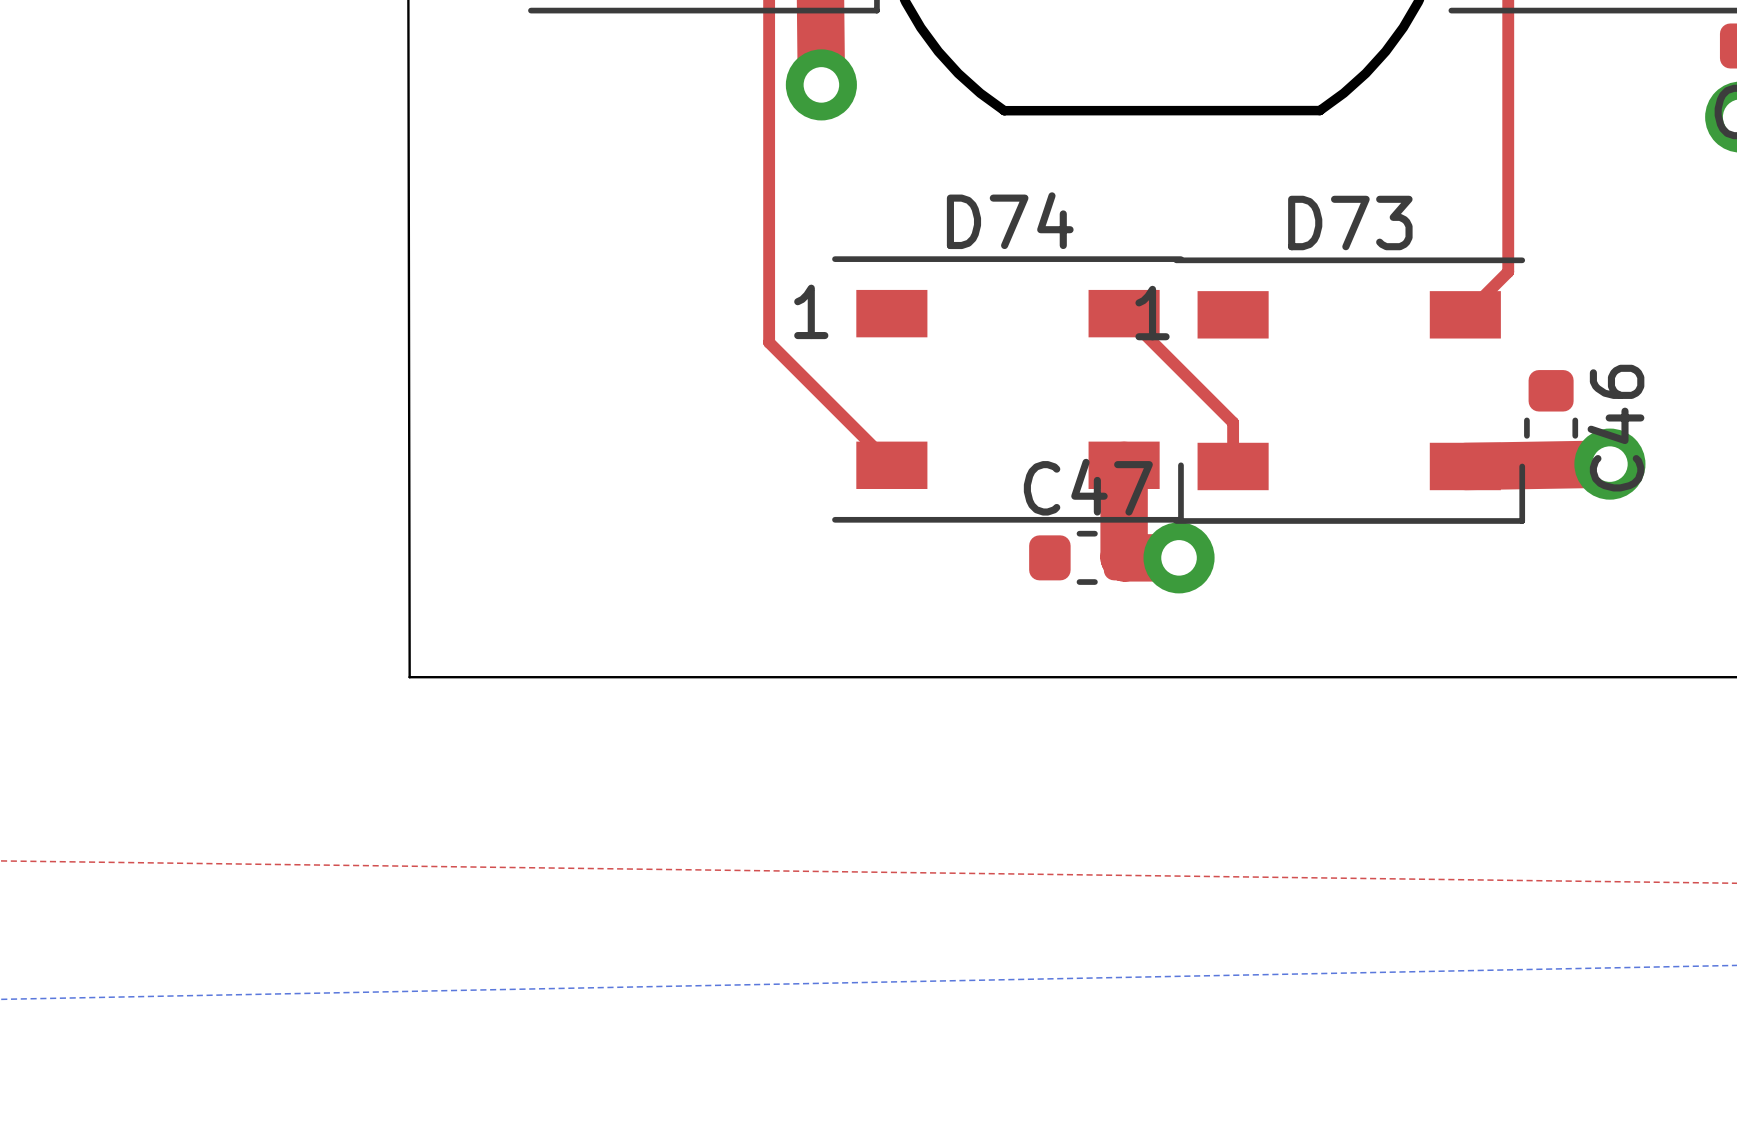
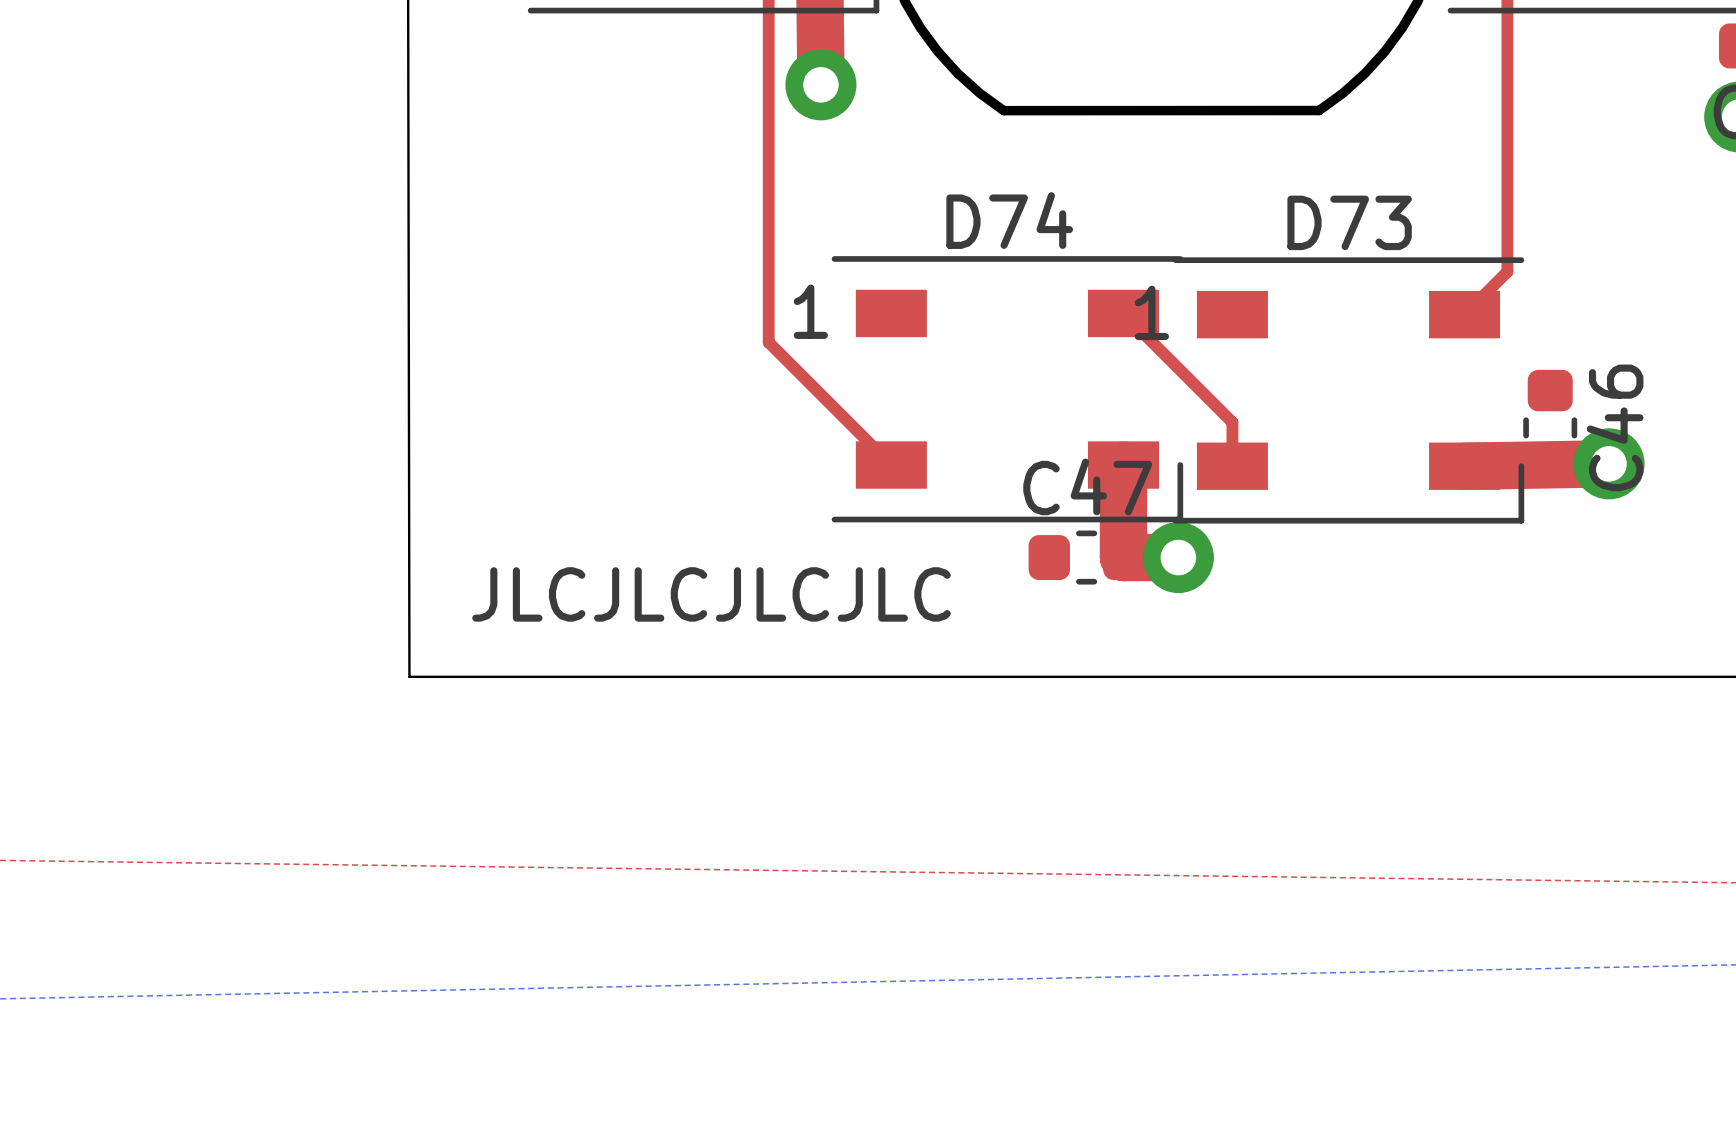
text: none -> JLCJLCJLCJLC (711, 594)

